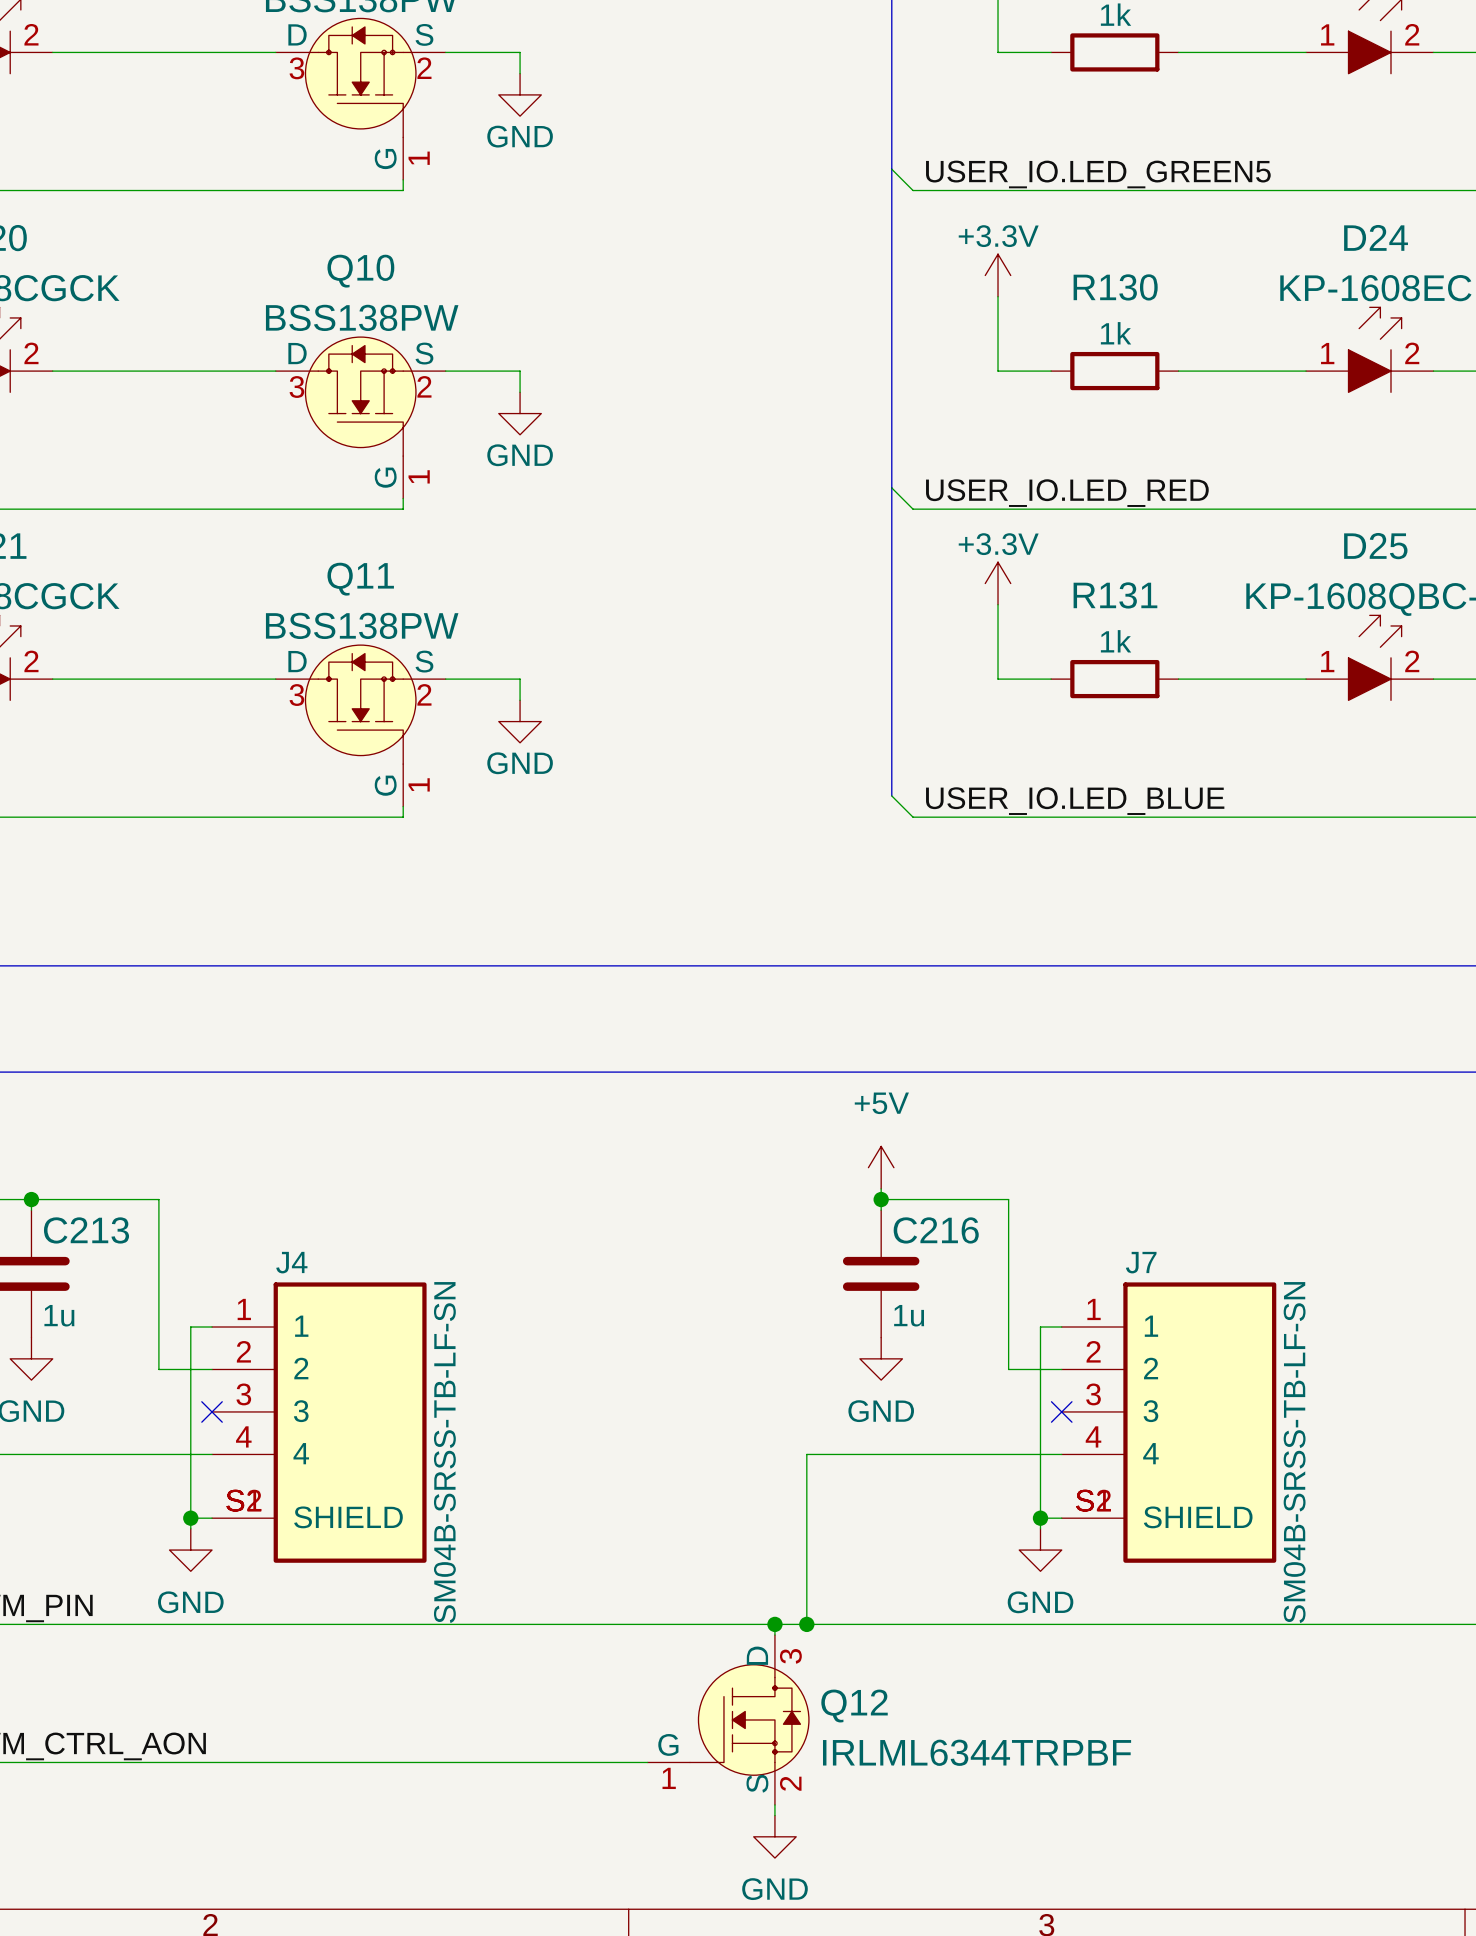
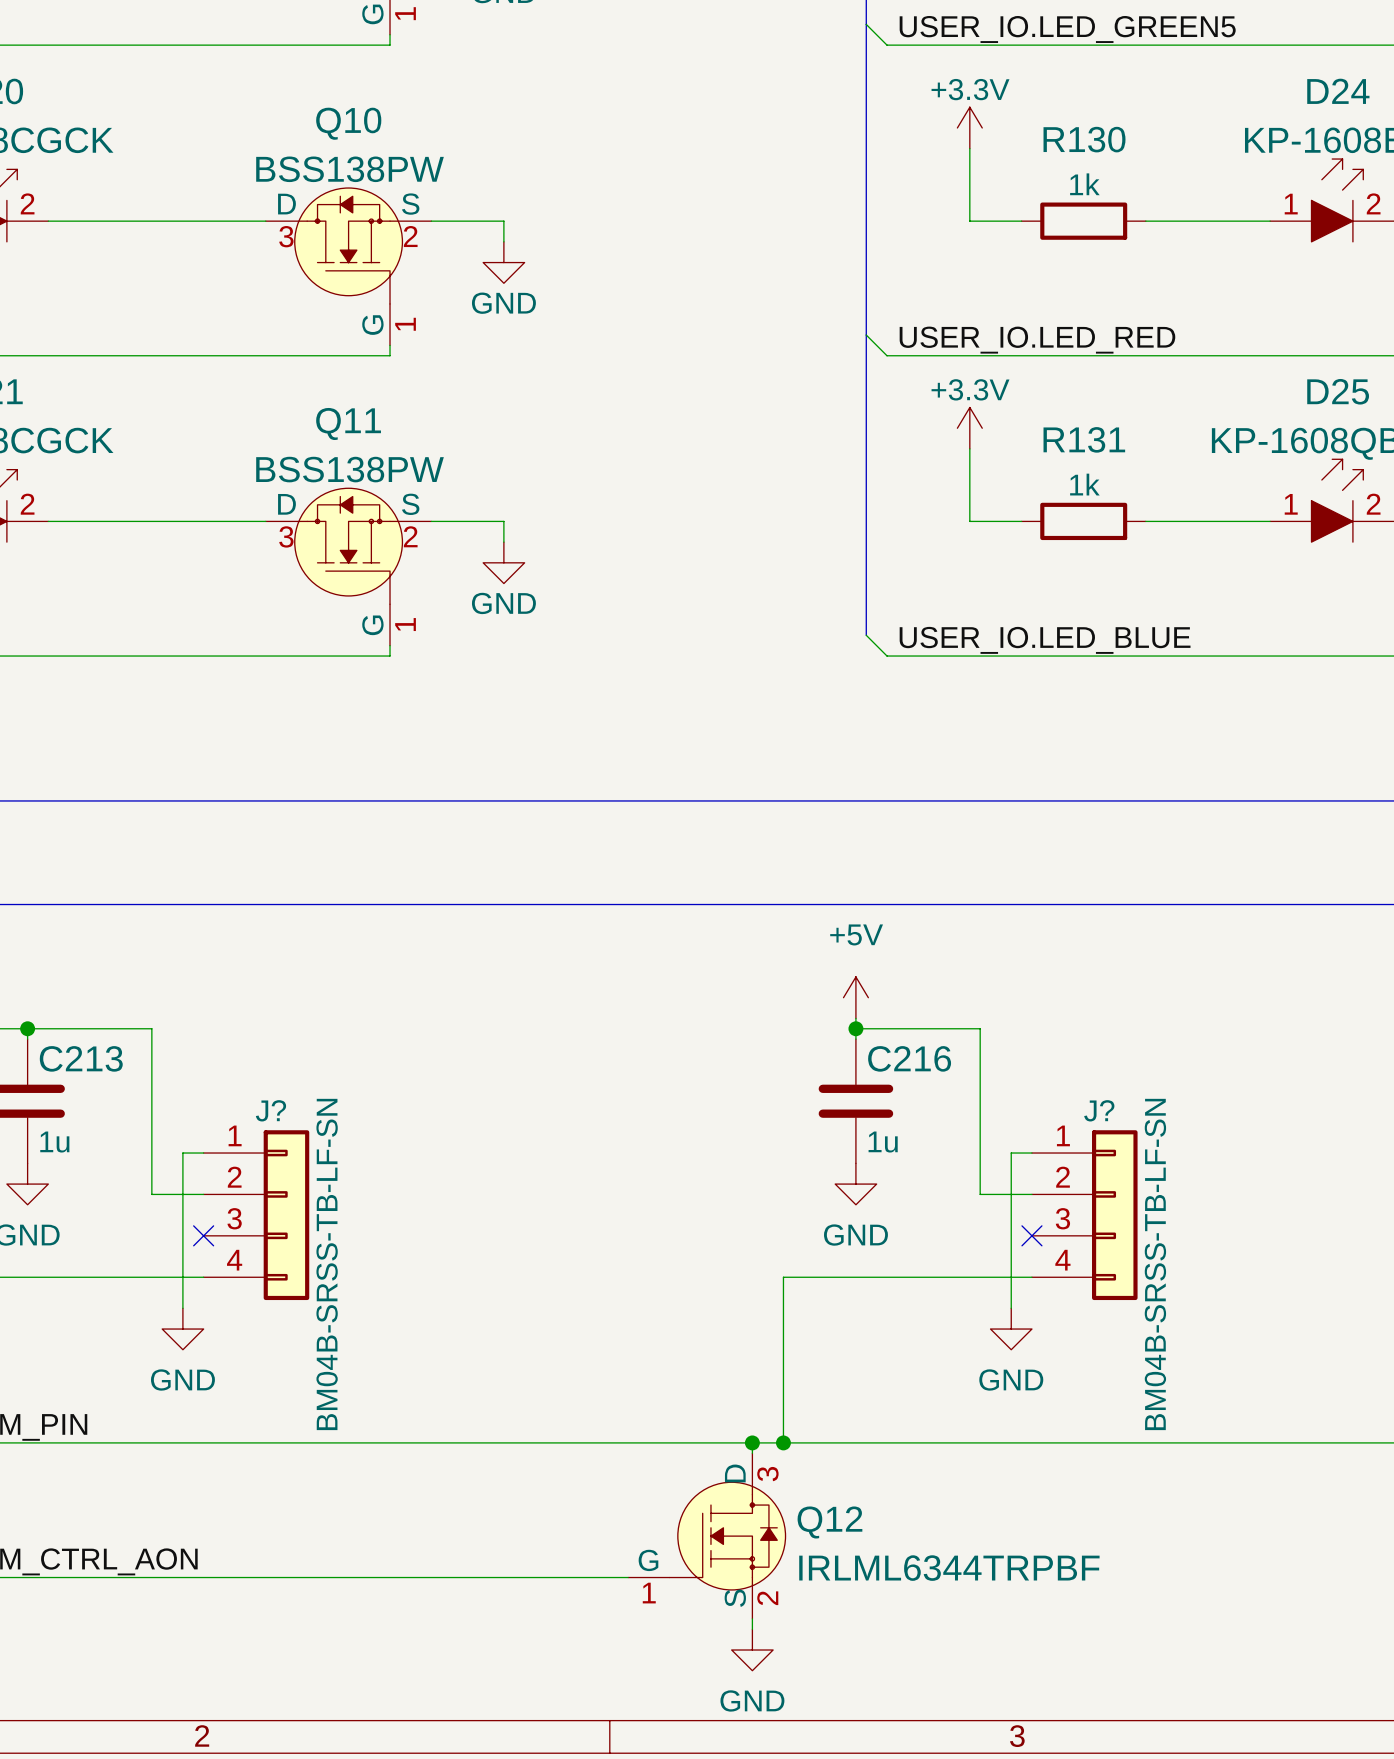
J?: none -> BM04B-SRSS-TB-LF-SN (256, 1215)
J?: none -> BM04B-SRSS-TB-LF-SN (1084, 1215)
J4: SM04B-SRSS-TB-LF-SN (319, 1422) -> none
J7: SM04B-SRSS-TB-LF-SN (1169, 1422) -> none
wire: (190, 1518) (212, 1518) -> none
junction: (190, 1518) -> none
wire: (1040, 1518) (1061, 1518) -> none
junction: (1040, 1518) -> none
power symbol position: GND (190, 1550) -> GND (182, 1329)
power symbol position: GND (1040, 1550) -> GND (1011, 1329)

